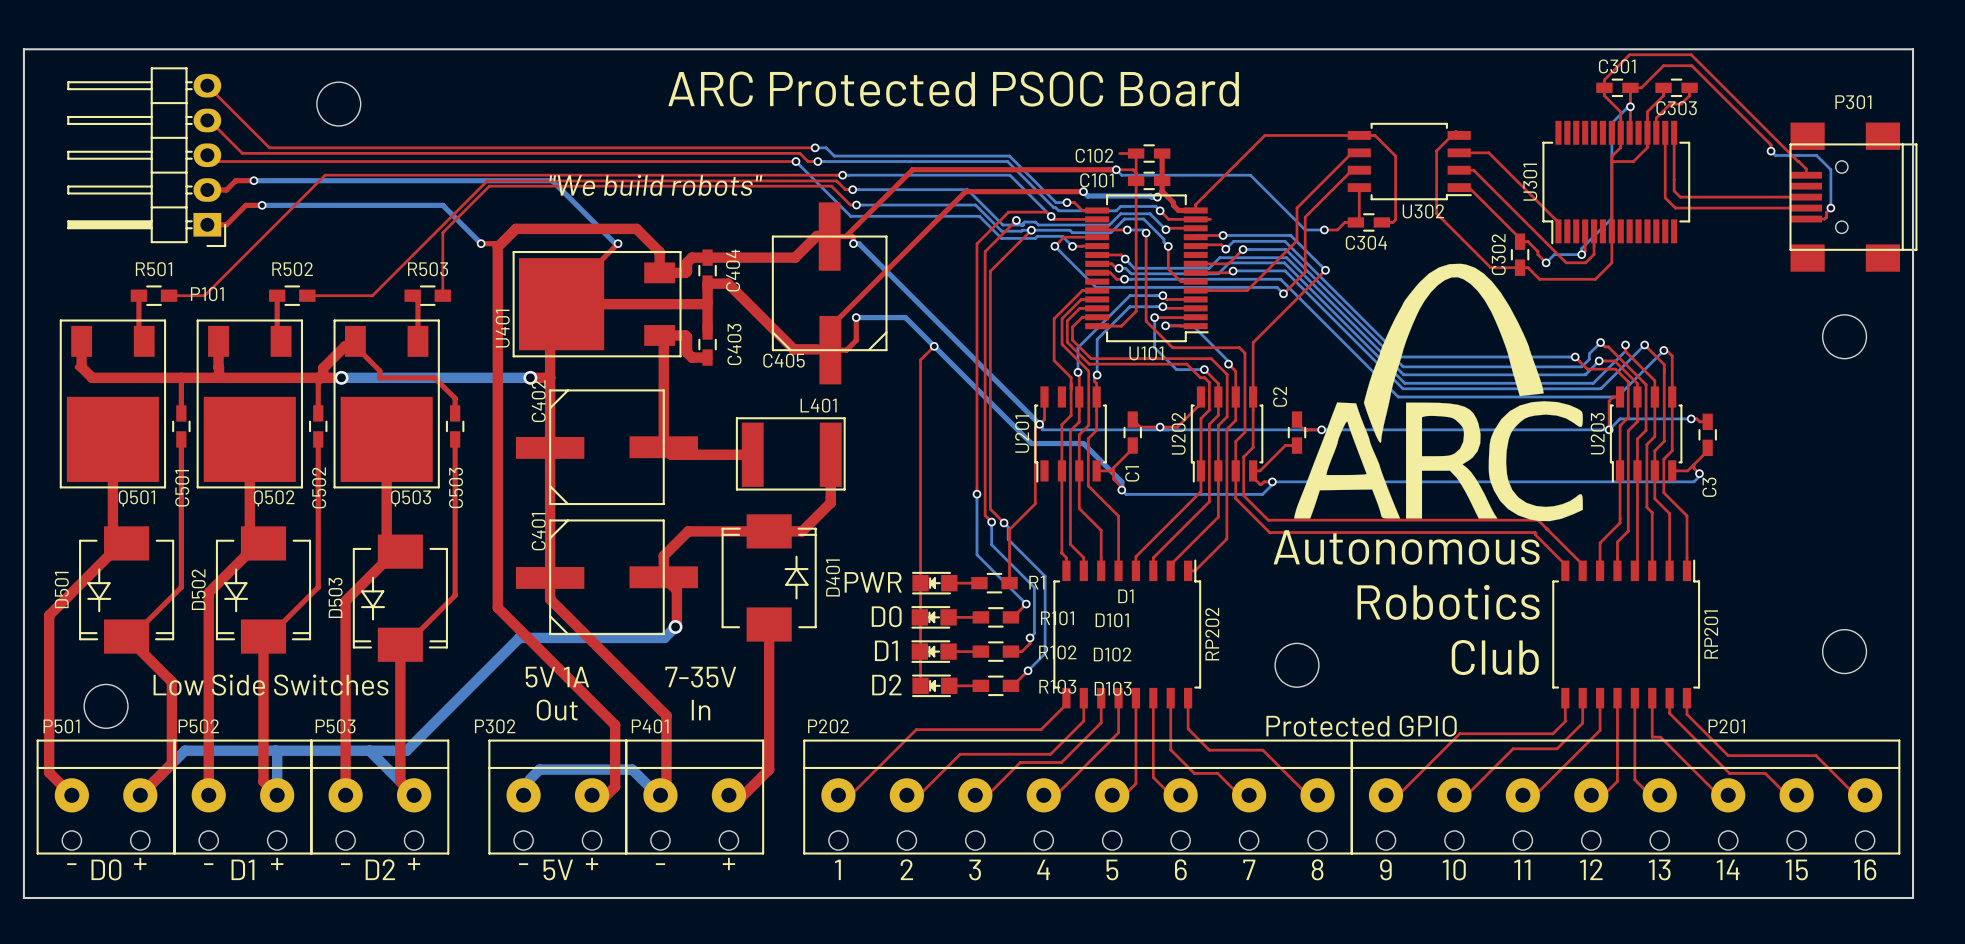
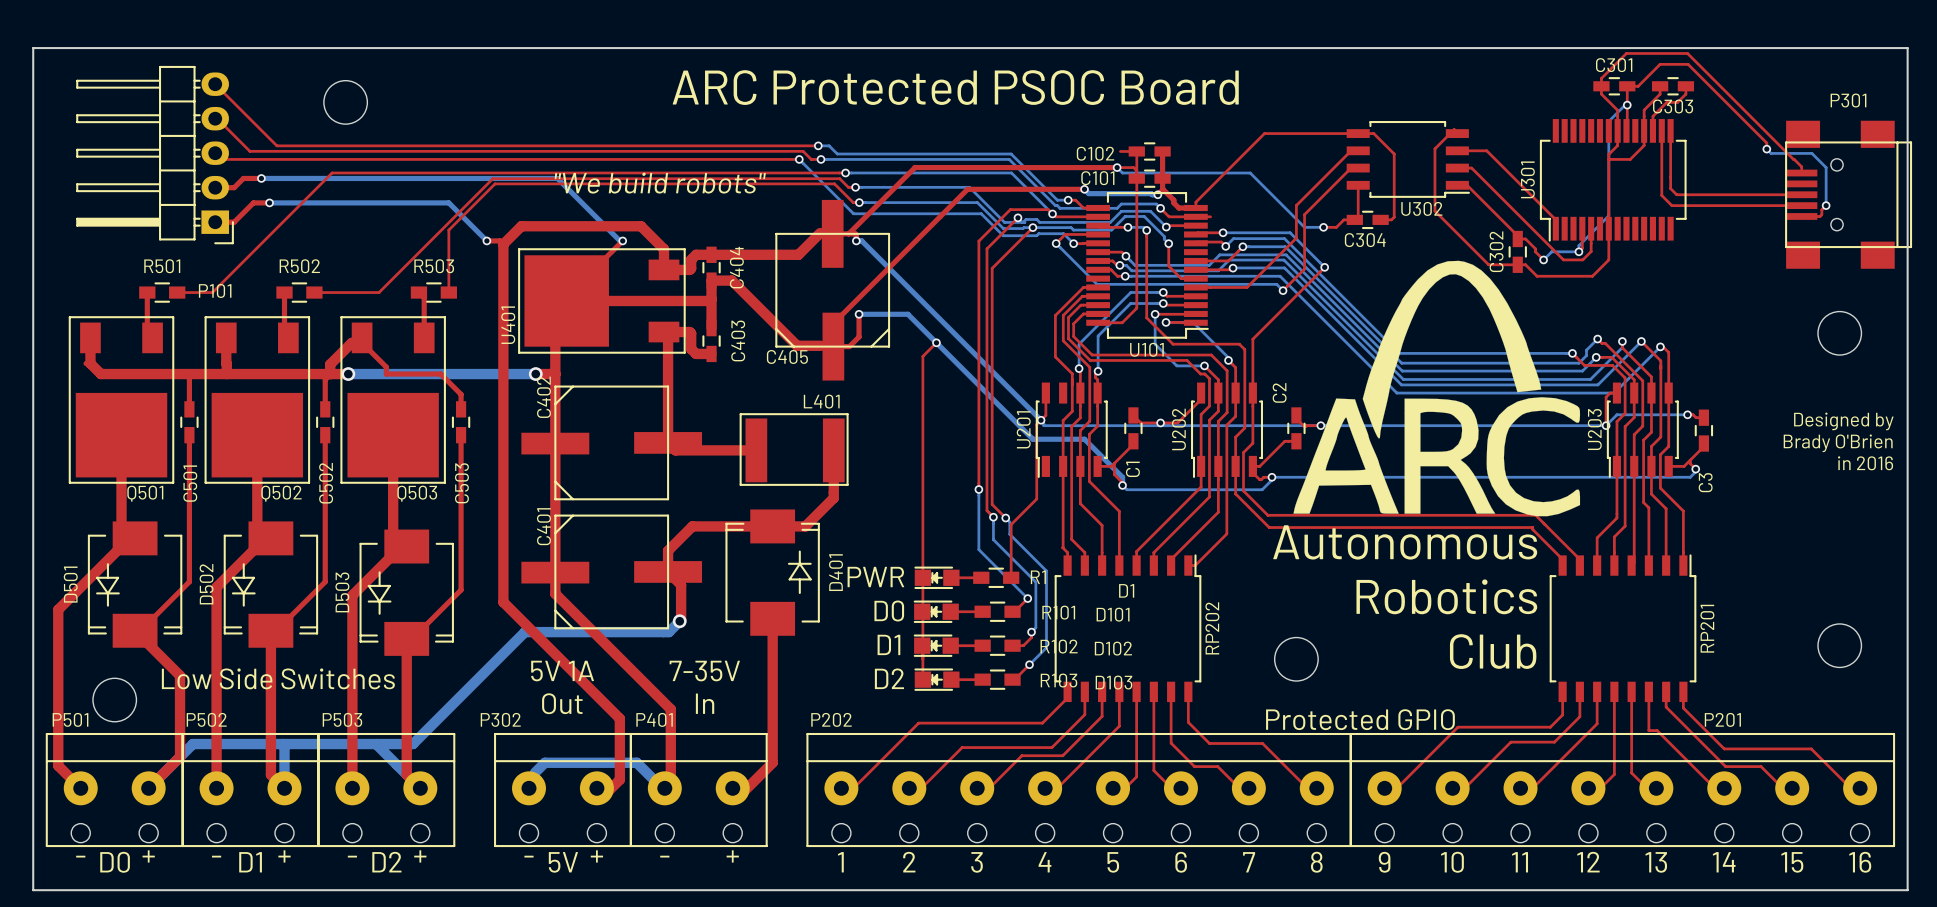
text: none -> Designed by (1843, 421)
text: none -> Brady O'Brien (1838, 443)
text: none -> in 2016 (1865, 463)

